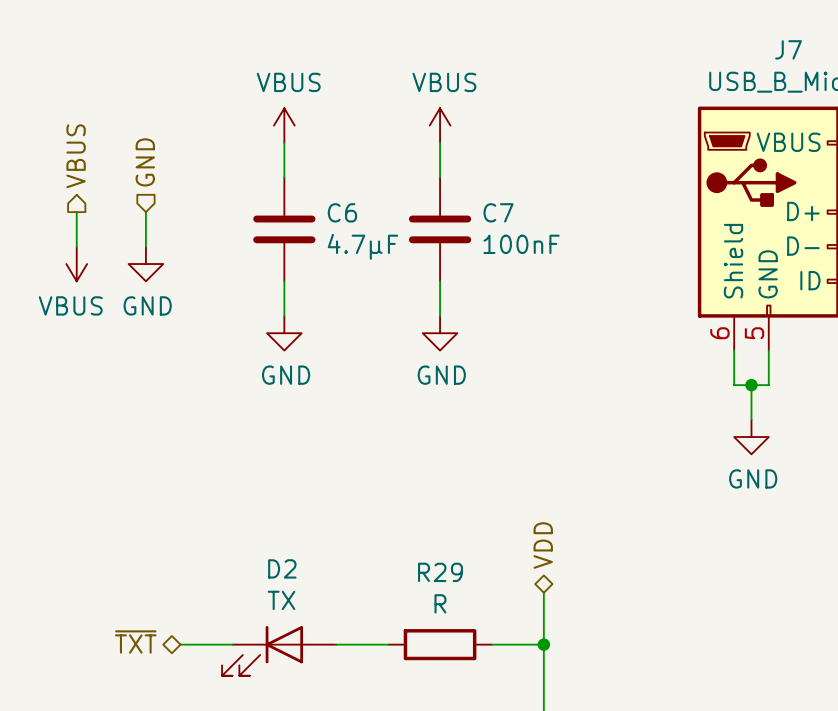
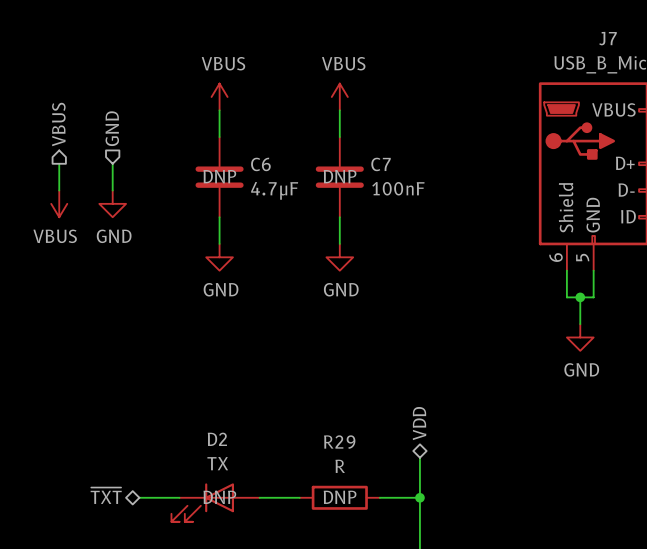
C6 text: none -> DNP (219, 176)
C7 text: none -> DNP (340, 176)
D2 text: none -> DNP (219, 497)
R29 text: none -> DNP (340, 497)

